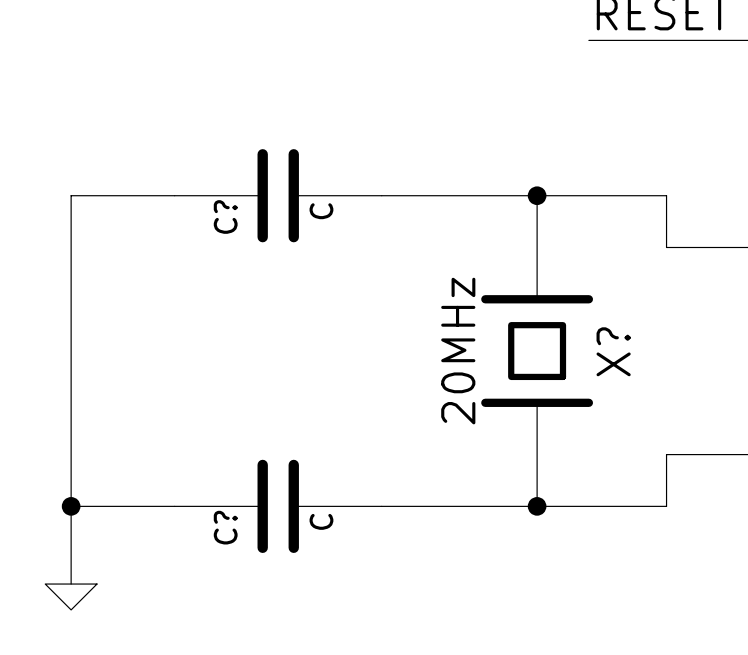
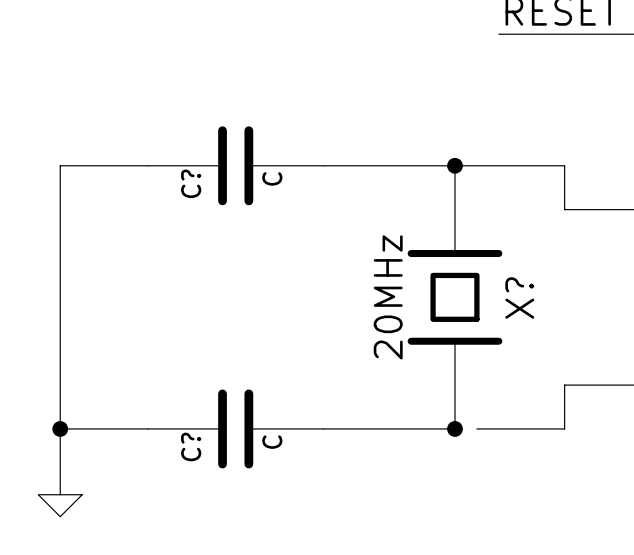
wire: (537, 506) (562, 506) -> none

